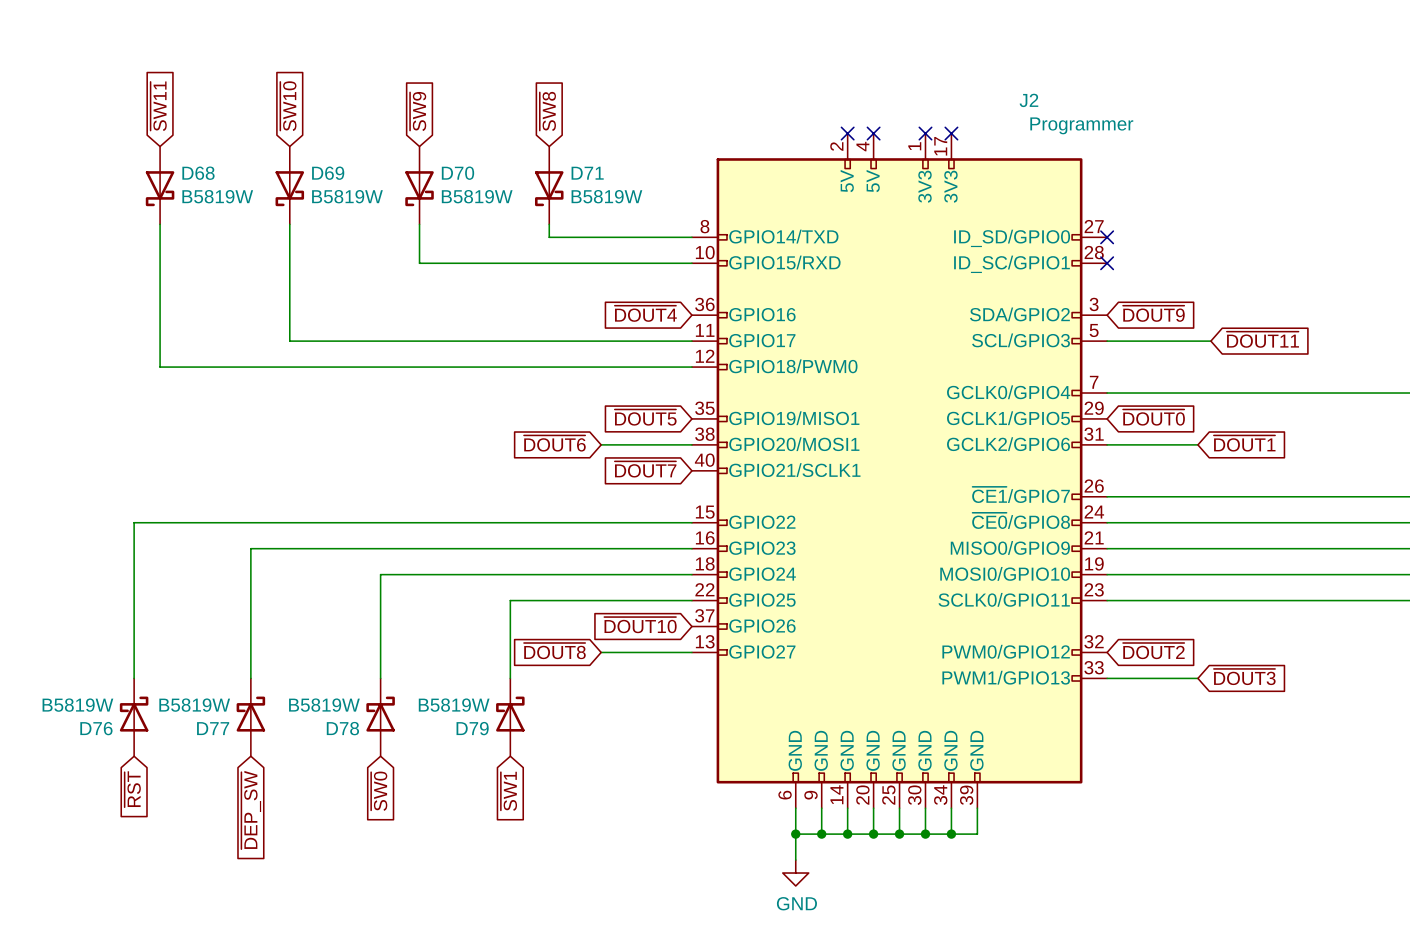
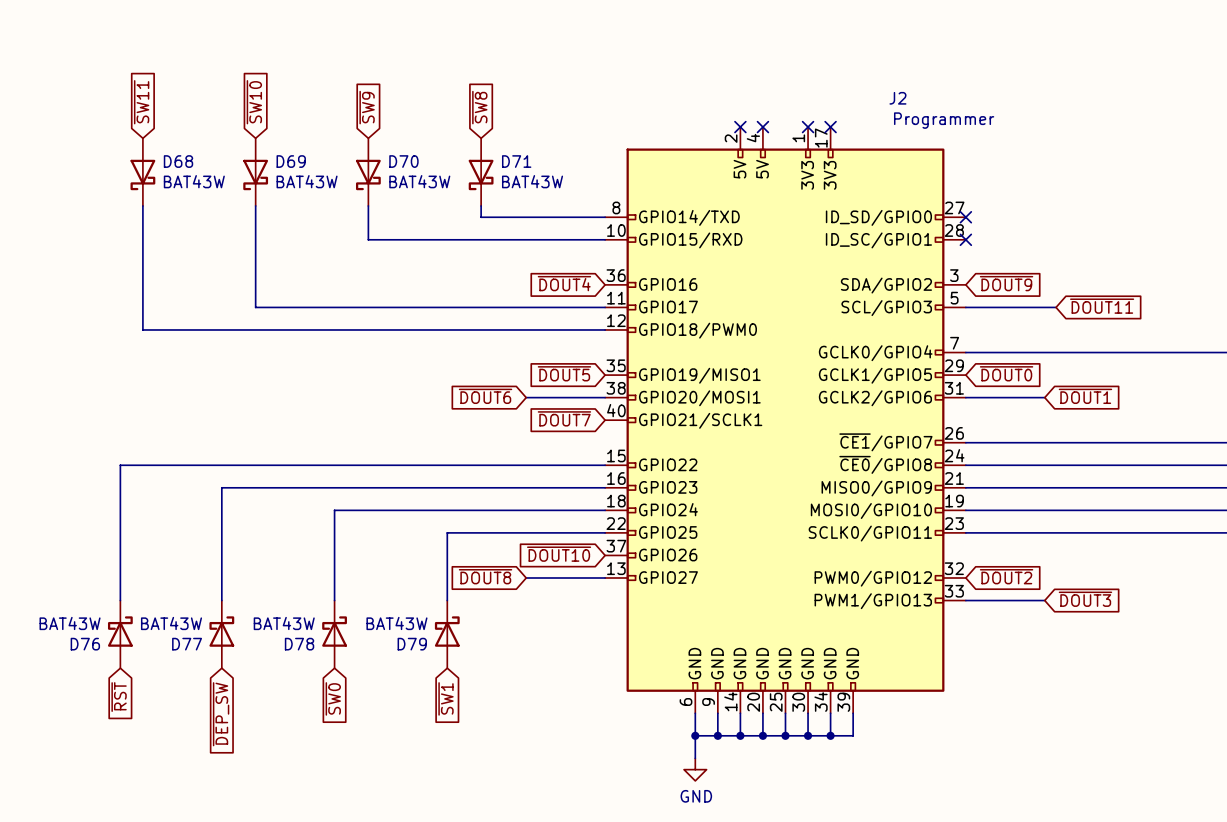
D68 value: B5819W (217, 196) -> BAT43W (194, 181)
D69 value: B5819W (347, 196) -> BAT43W (307, 181)
D70 value: B5819W (477, 196) -> BAT43W (419, 181)
D71 value: B5819W (606, 196) -> BAT43W (532, 181)
D76 value: B5819W (77, 705) -> BAT43W (70, 623)
D77 value: B5819W (194, 705) -> BAT43W (171, 623)
D78 value: B5819W (324, 705) -> BAT43W (284, 623)
D79 value: B5819W (454, 705) -> BAT43W (396, 623)

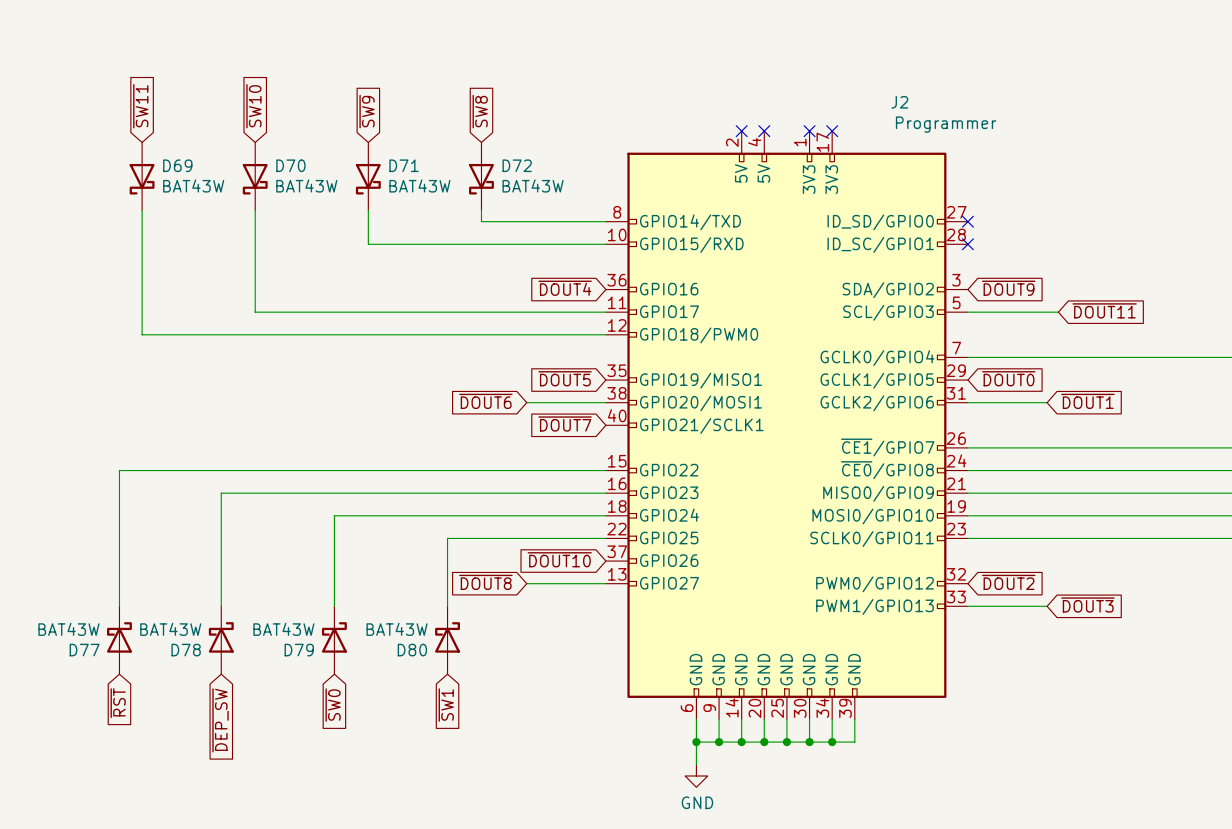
D68 name: D68 (178, 161) -> D69 (177, 165)
D69 name: D69 (291, 161) -> D70 (290, 165)
D70 name: D70 (403, 161) -> D71 (404, 165)
D71 name: D71 (516, 161) -> D72 (517, 165)
D76 name: D76 (85, 644) -> D77 (84, 650)
D77 name: D77 (187, 644) -> D78 (186, 650)
D78 name: D78 (299, 644) -> D79 (299, 650)
D79 name: D79 (412, 644) -> D80 (412, 650)

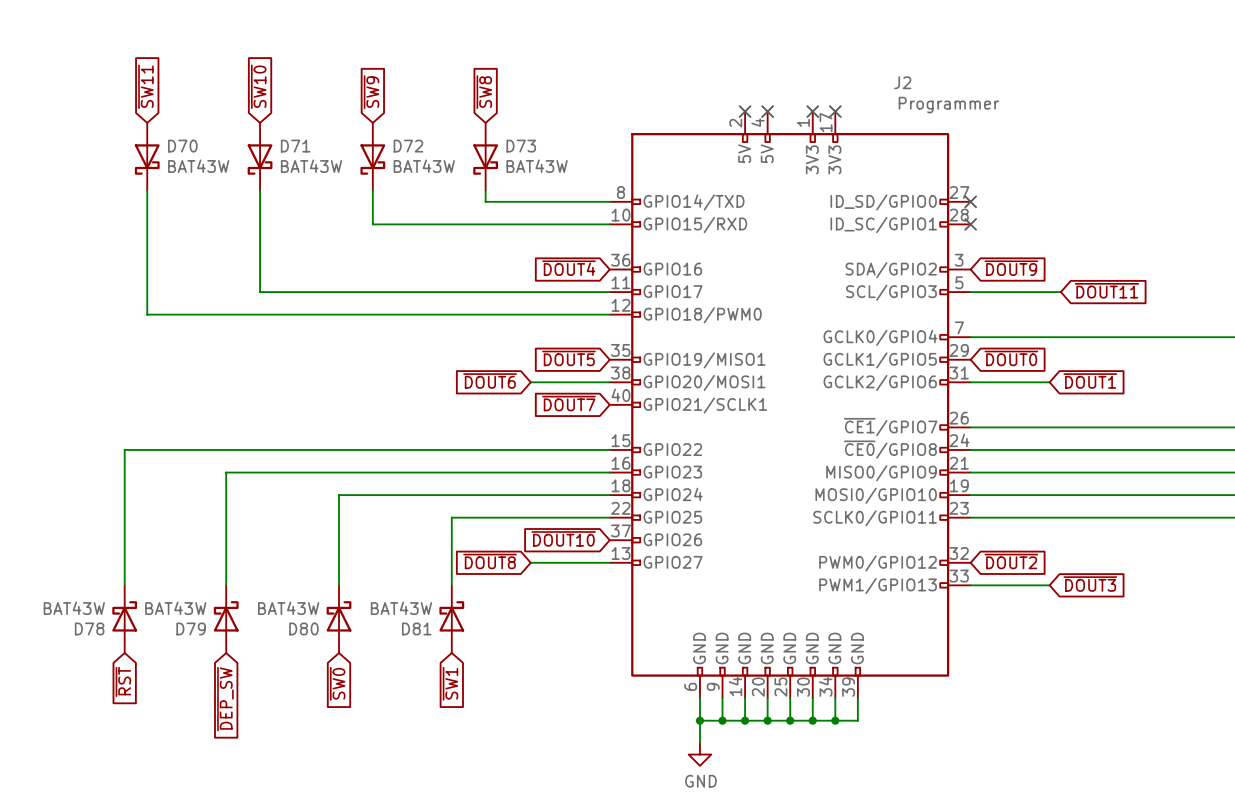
D69 name: D69 (177, 165) -> D70 (182, 146)
D70 name: D70 (290, 165) -> D71 (295, 146)
D71 name: D71 (404, 165) -> D72 (408, 146)
D72 name: D72 (517, 165) -> D73 (521, 146)
D77 name: D77 (84, 650) -> D78 (89, 628)
D78 name: D78 (186, 650) -> D79 (191, 628)
D79 name: D79 (299, 650) -> D80 (303, 628)
D80 name: D80 (412, 650) -> D81 (416, 628)

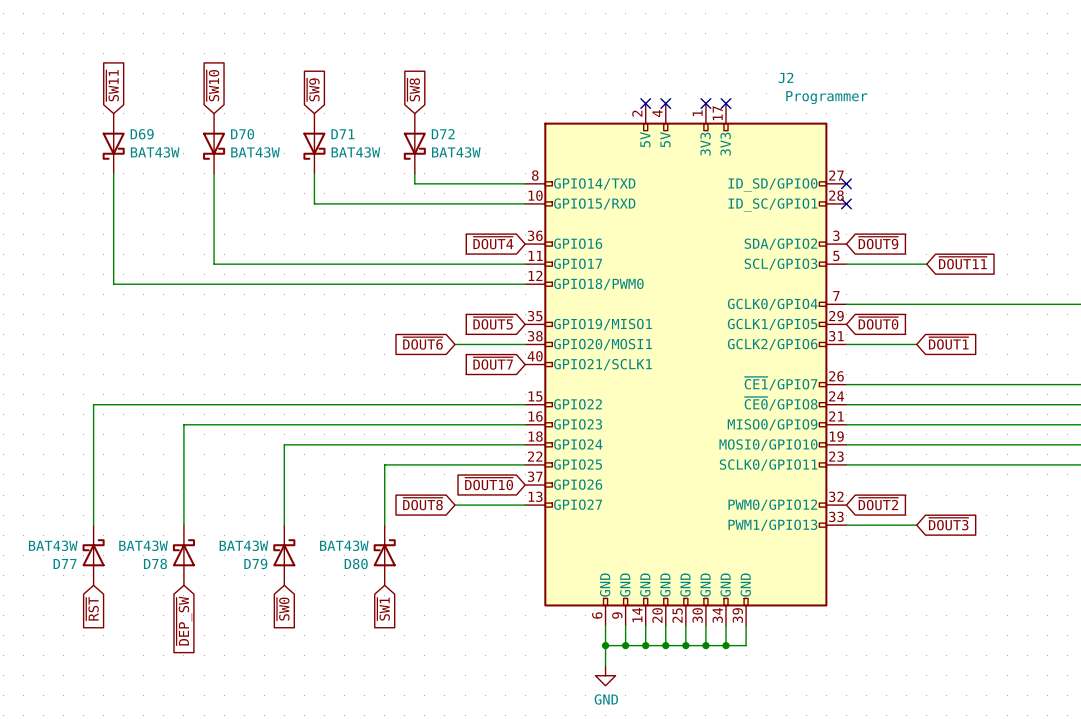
D70 name: D70 (182, 146) -> D69 (142, 134)
D71 name: D71 (295, 146) -> D70 (242, 134)
D72 name: D72 (408, 146) -> D71 (342, 134)
D73 name: D73 (521, 146) -> D72 (443, 134)
D78 name: D78 (89, 628) -> D77 (65, 563)
D79 name: D79 (191, 628) -> D78 (155, 563)
D80 name: D80 (303, 628) -> D79 (255, 563)
D81 name: D81 (416, 628) -> D80 (356, 563)

